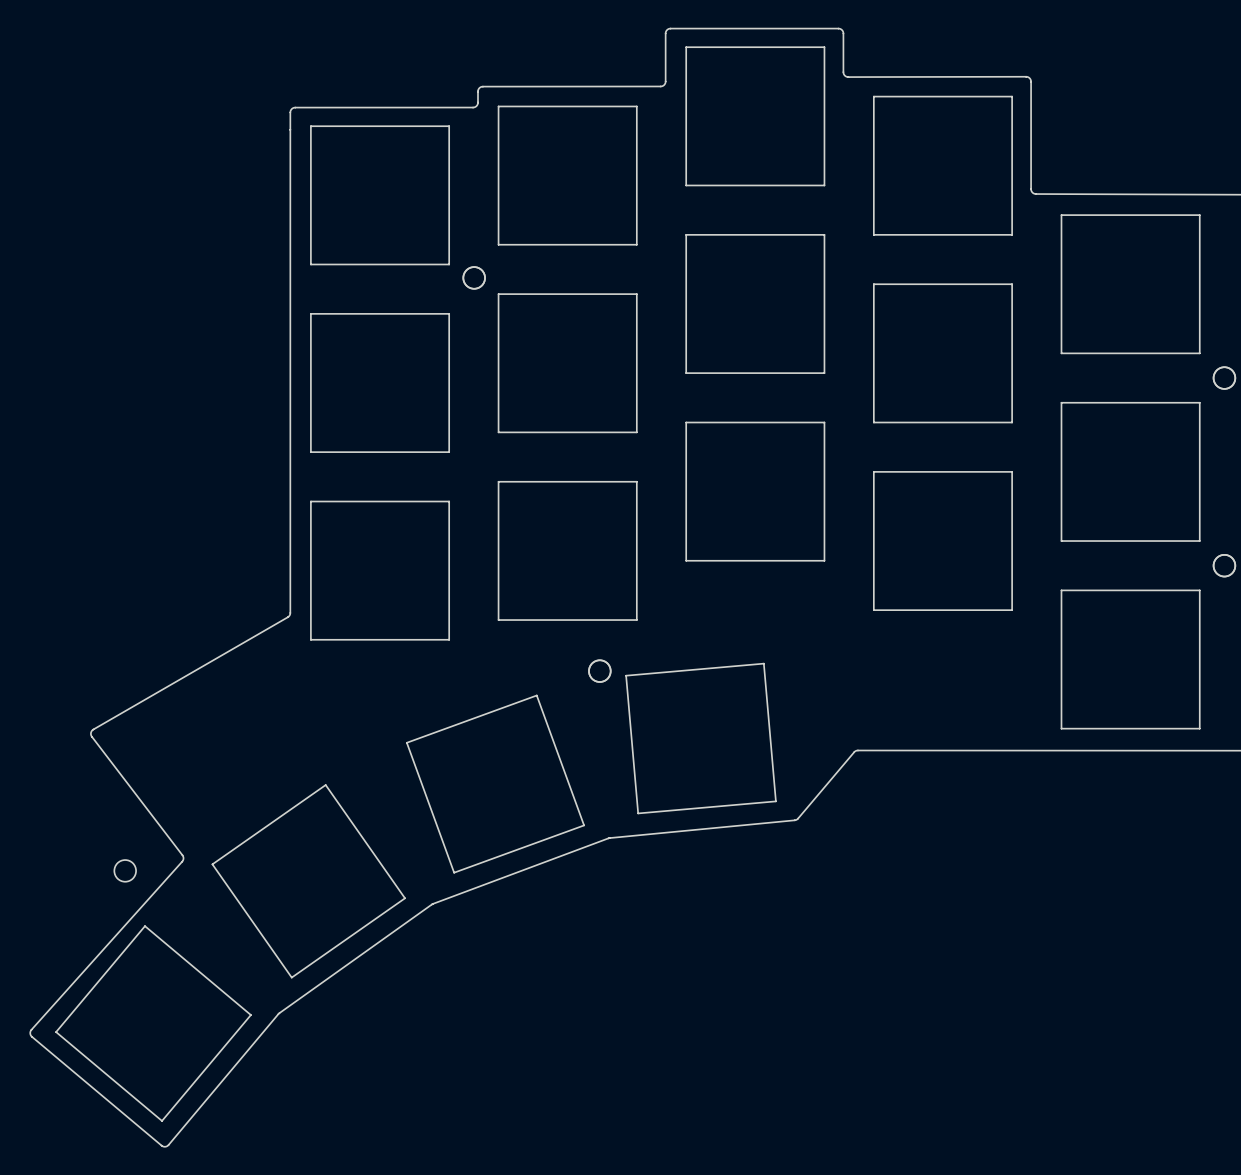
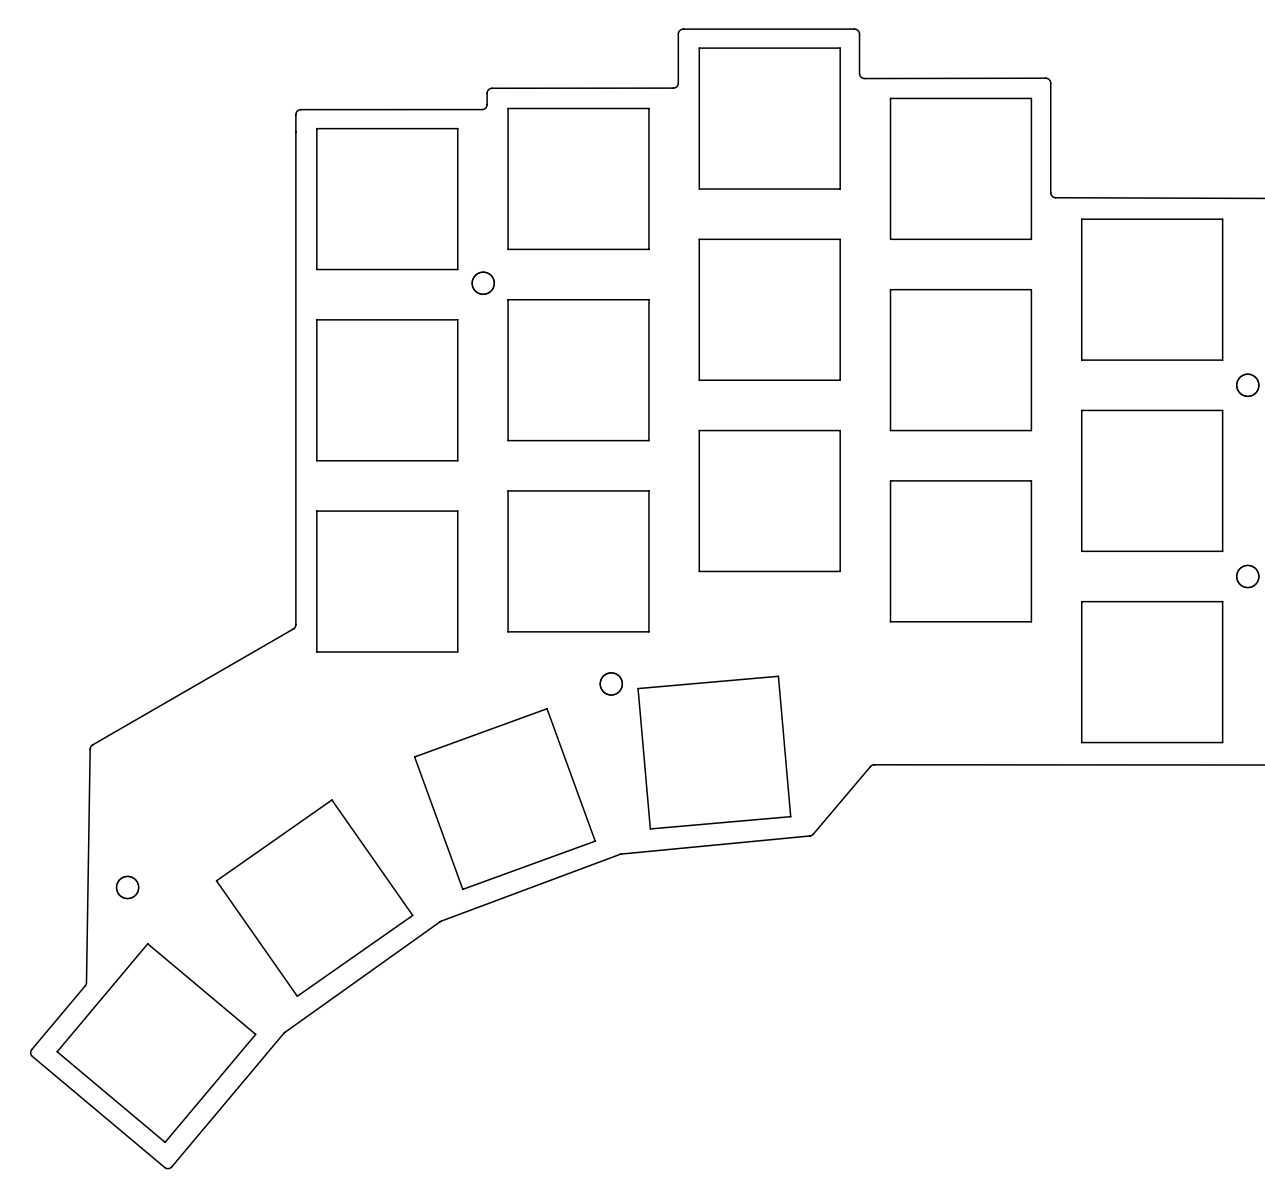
board edge: (93, 729) (91, 732) (91, 736) (183, 859) (31, 1029) (30, 1033) (32, 1036) -> (95, 743) (90, 749) (86, 983) (31, 1049) (32, 1056)
round board edge: none -> [115, 875, 140, 900]

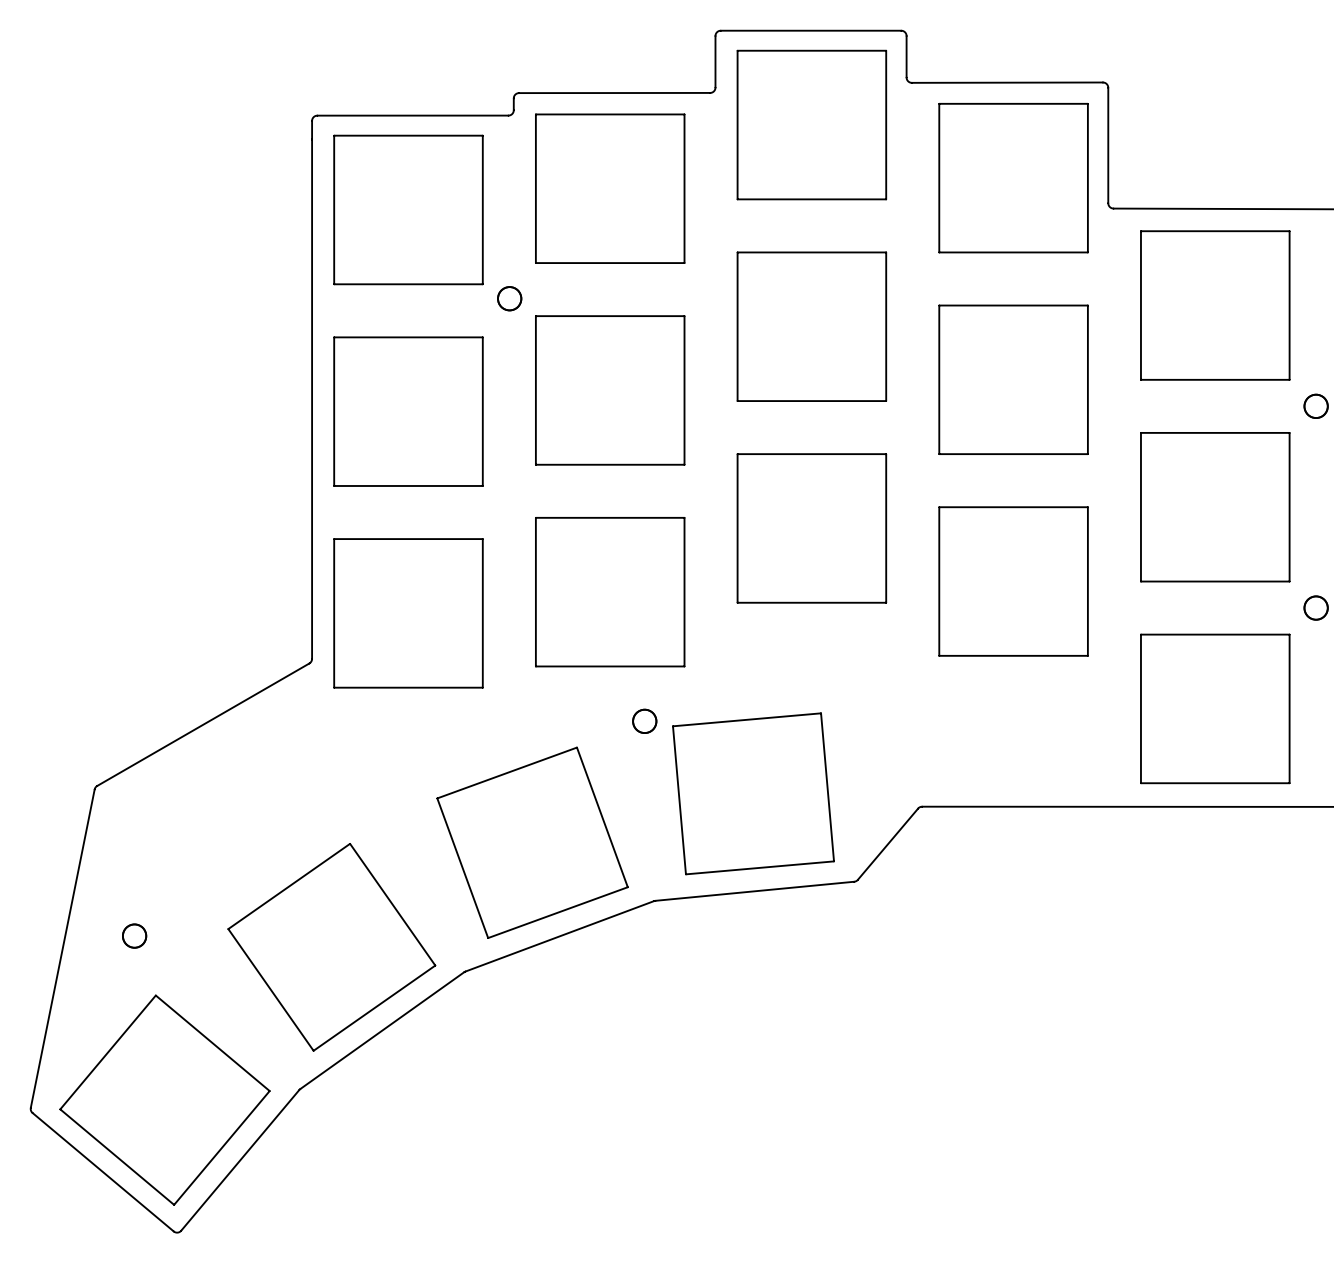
board edge: (92, 744) (90, 749) (86, 983) (31, 1049) (32, 1056) -> (97, 785) (94, 789) (30, 1107) (34, 1114)

